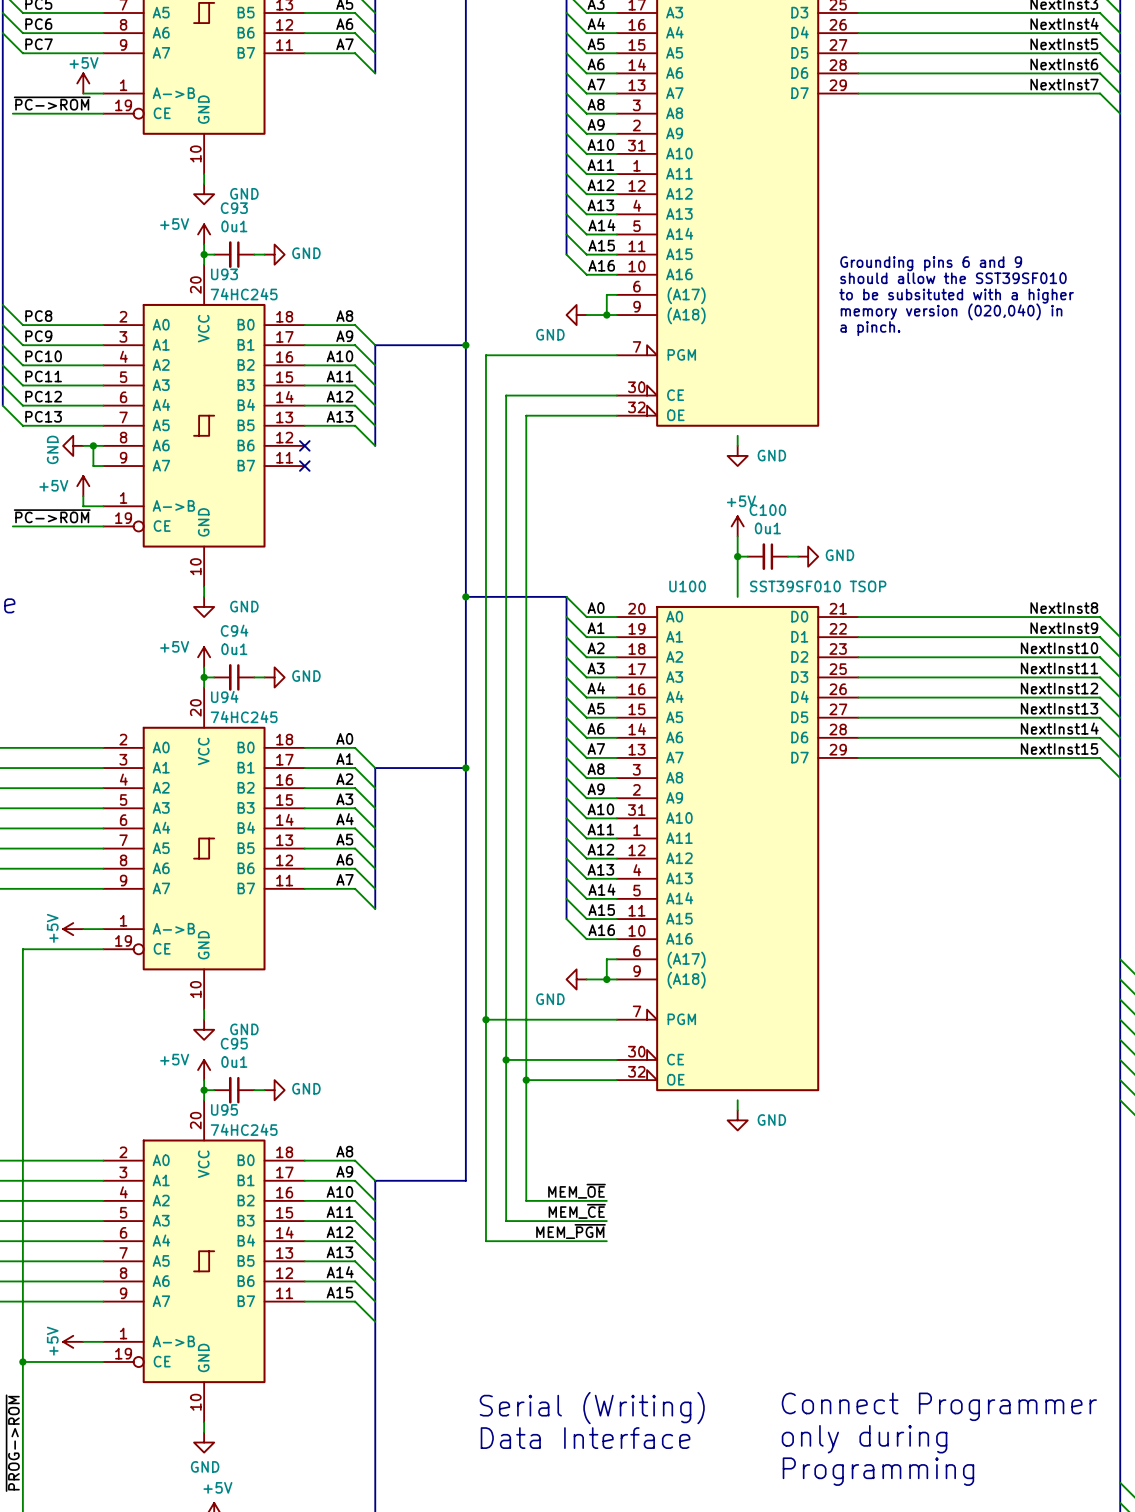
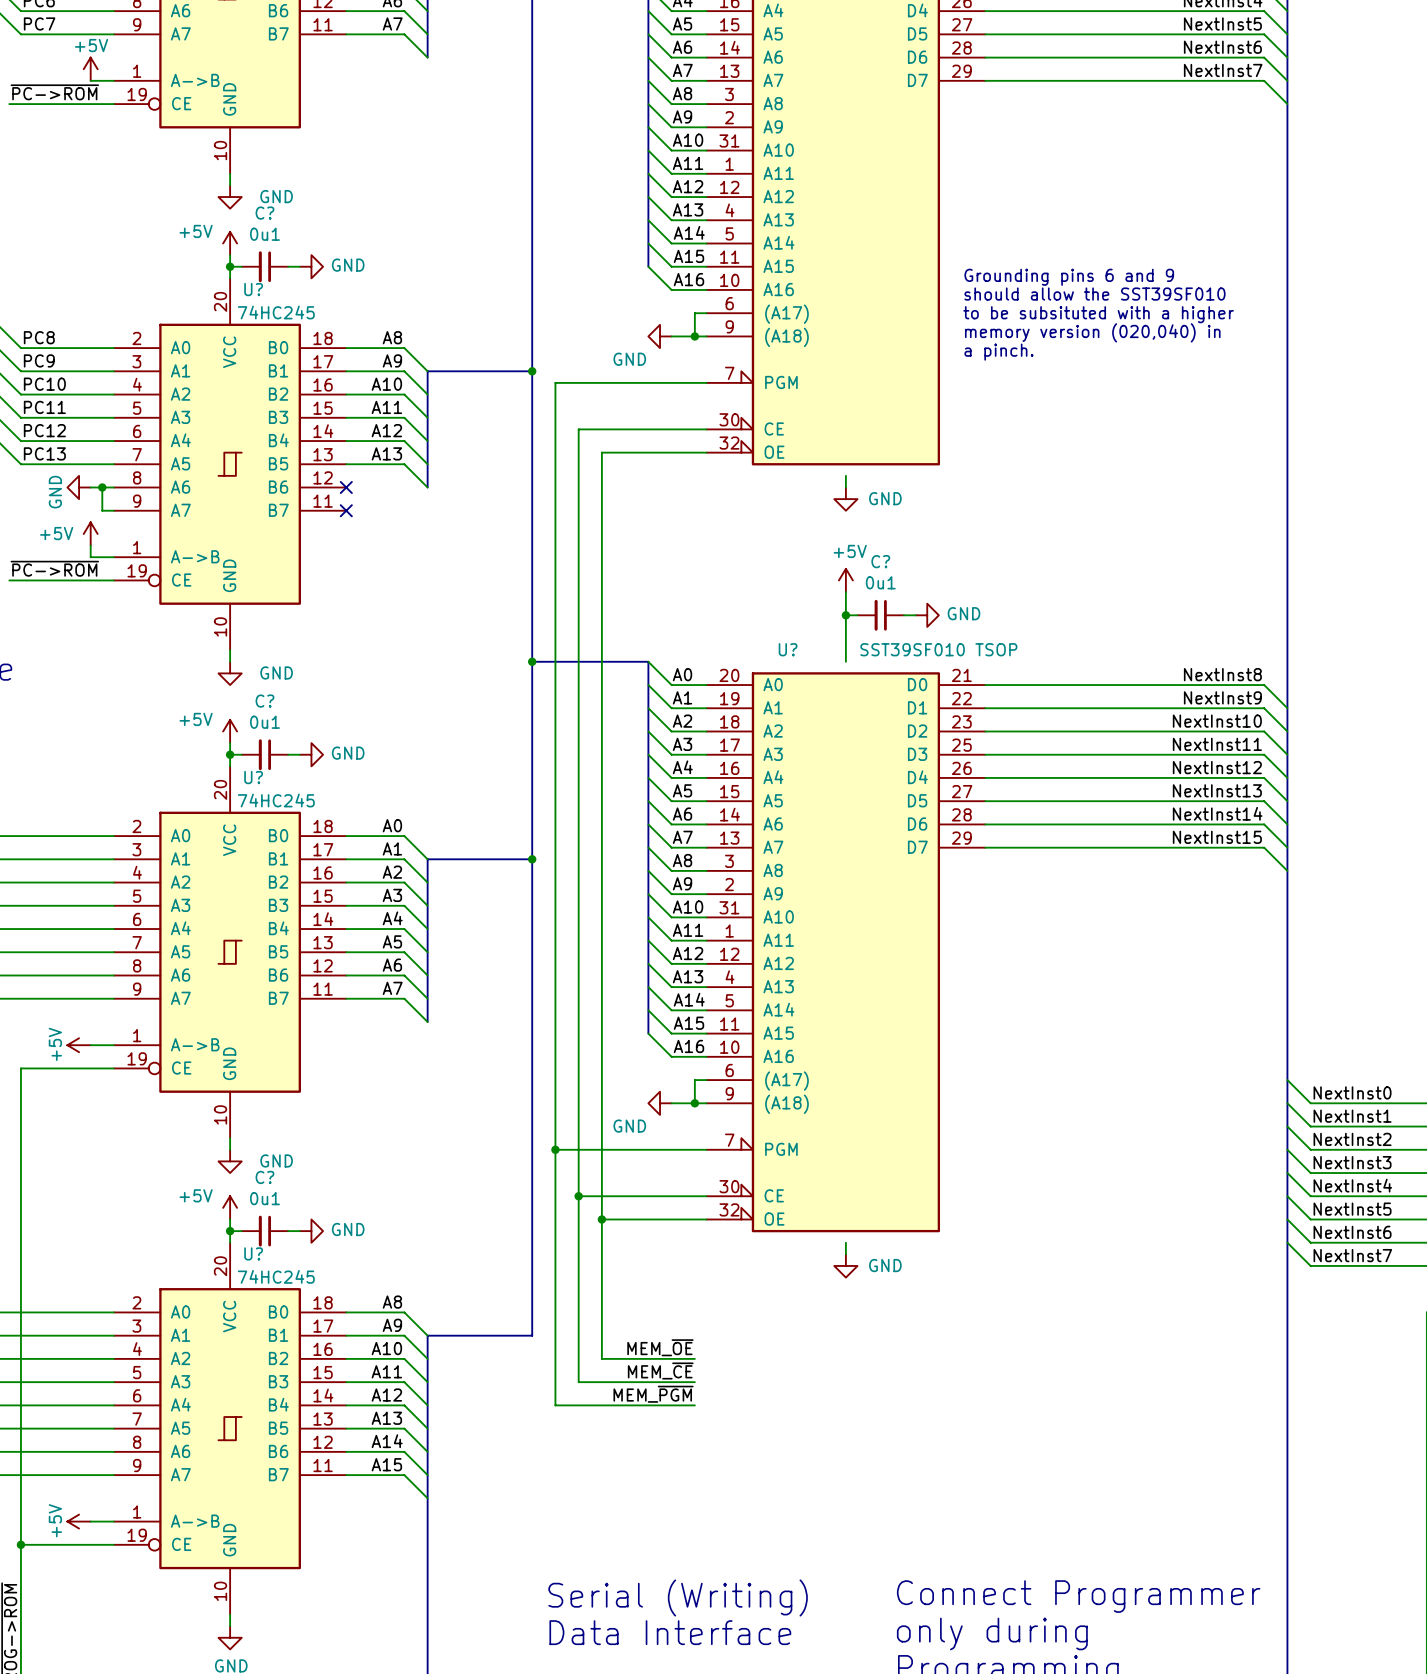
C93 name: C93 (234, 208) -> C? (264, 213)
U93 name: U93 (224, 274) -> U? (253, 289)
C100 name: C100 (767, 510) -> C? (880, 561)
U100 name: U100 (687, 586) -> U? (788, 649)
C94 name: C94 (234, 630) -> C? (264, 701)
U94 name: U94 (224, 696) -> U? (253, 777)
C95 name: C95 (234, 1043) -> C? (264, 1177)
U95 name: U95 (224, 1109) -> U? (253, 1253)

